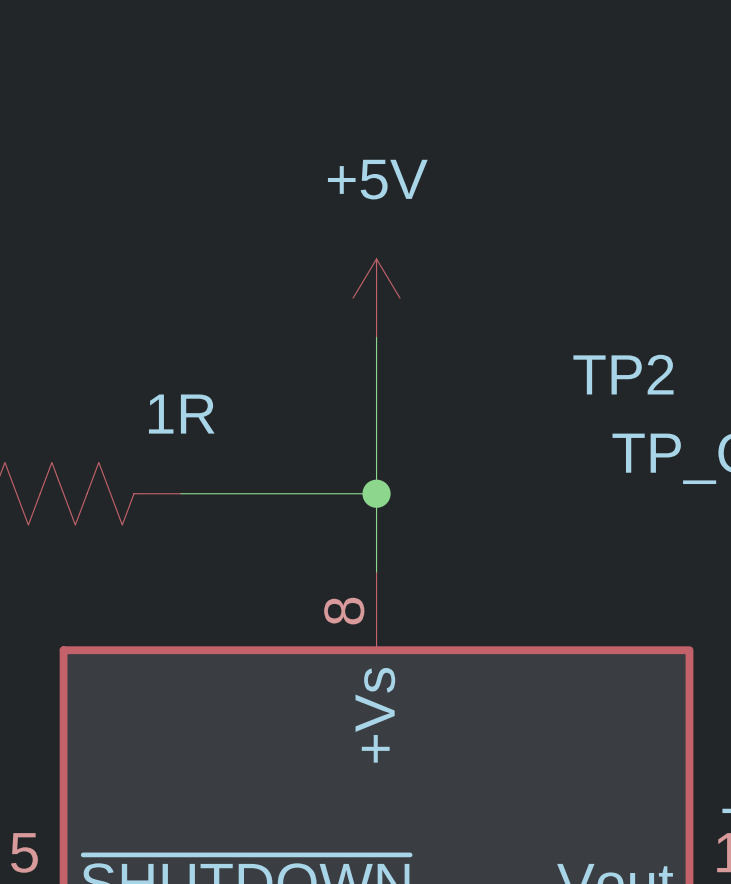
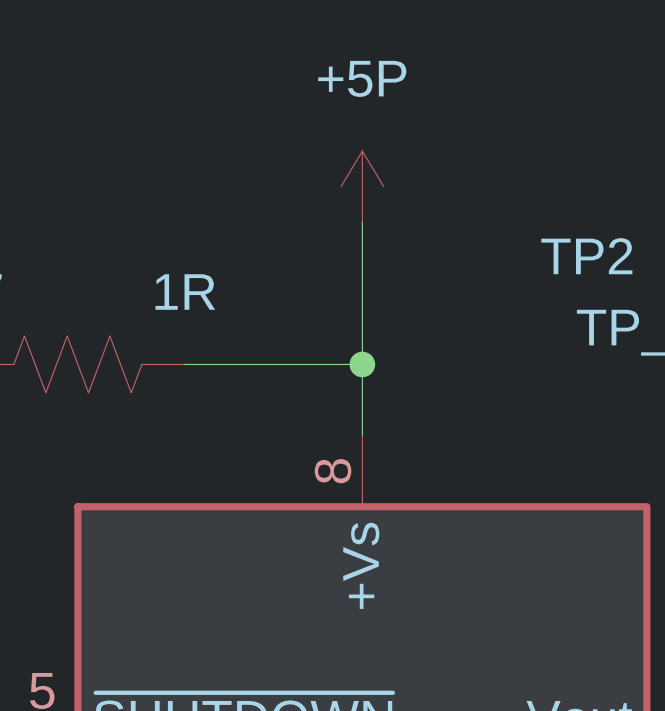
power symbol: +5V (376, 298) -> +5P (362, 186)

